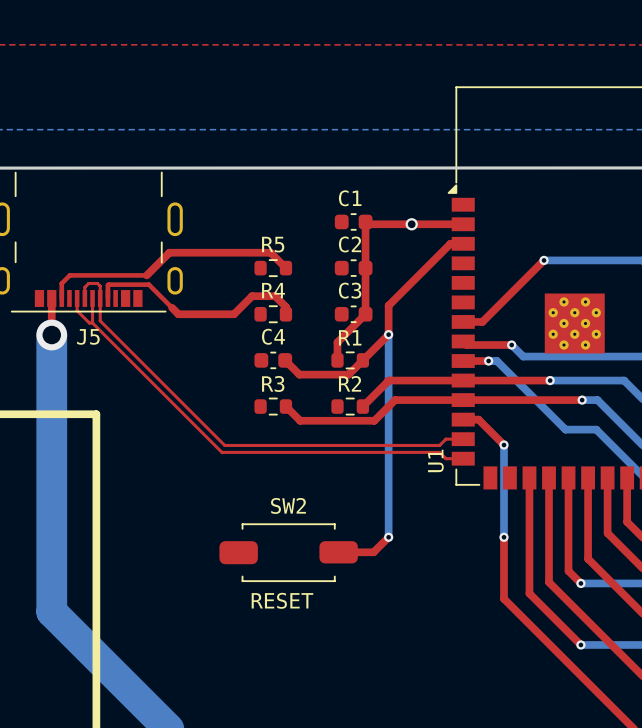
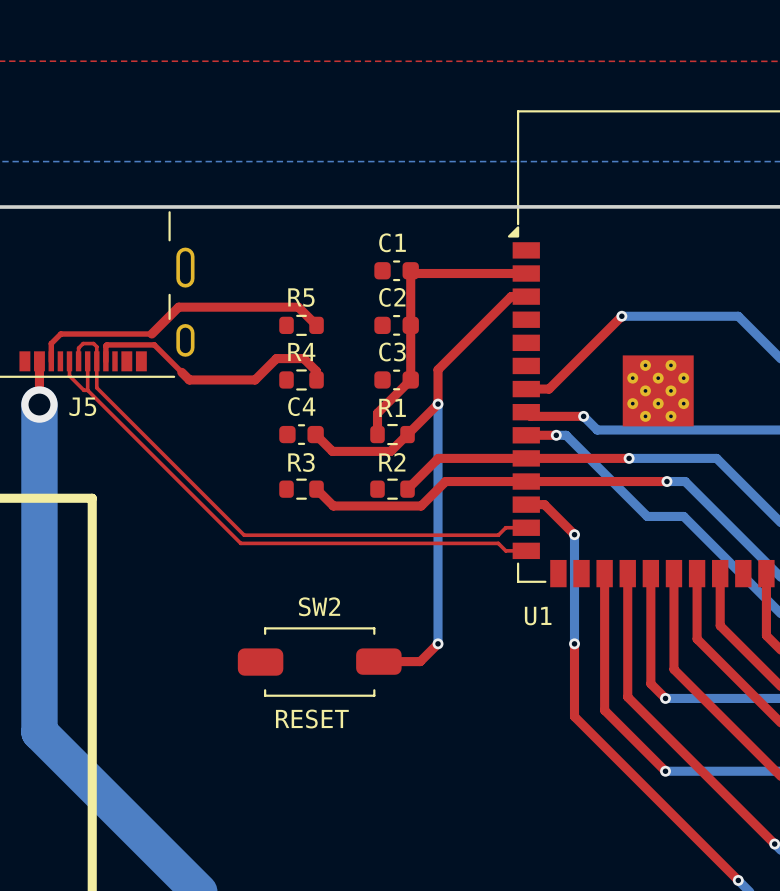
via: (411, 224) -> none
U1 name rotation: 0° (435, 460) -> 90° clockwise (538, 616)
U1 name position: U1 (435, 460) -> U1 (538, 616)

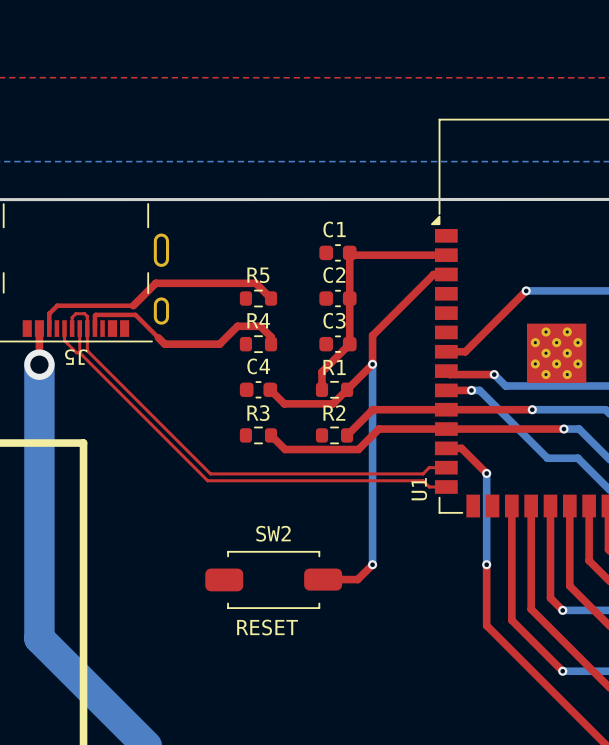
J5 name rotation: 0° (82, 406) -> 180° (76, 357)
U1 name rotation: 0° (538, 616) -> 90° counterclockwise (419, 489)
U1 name position: U1 (538, 616) -> U1 (419, 489)

